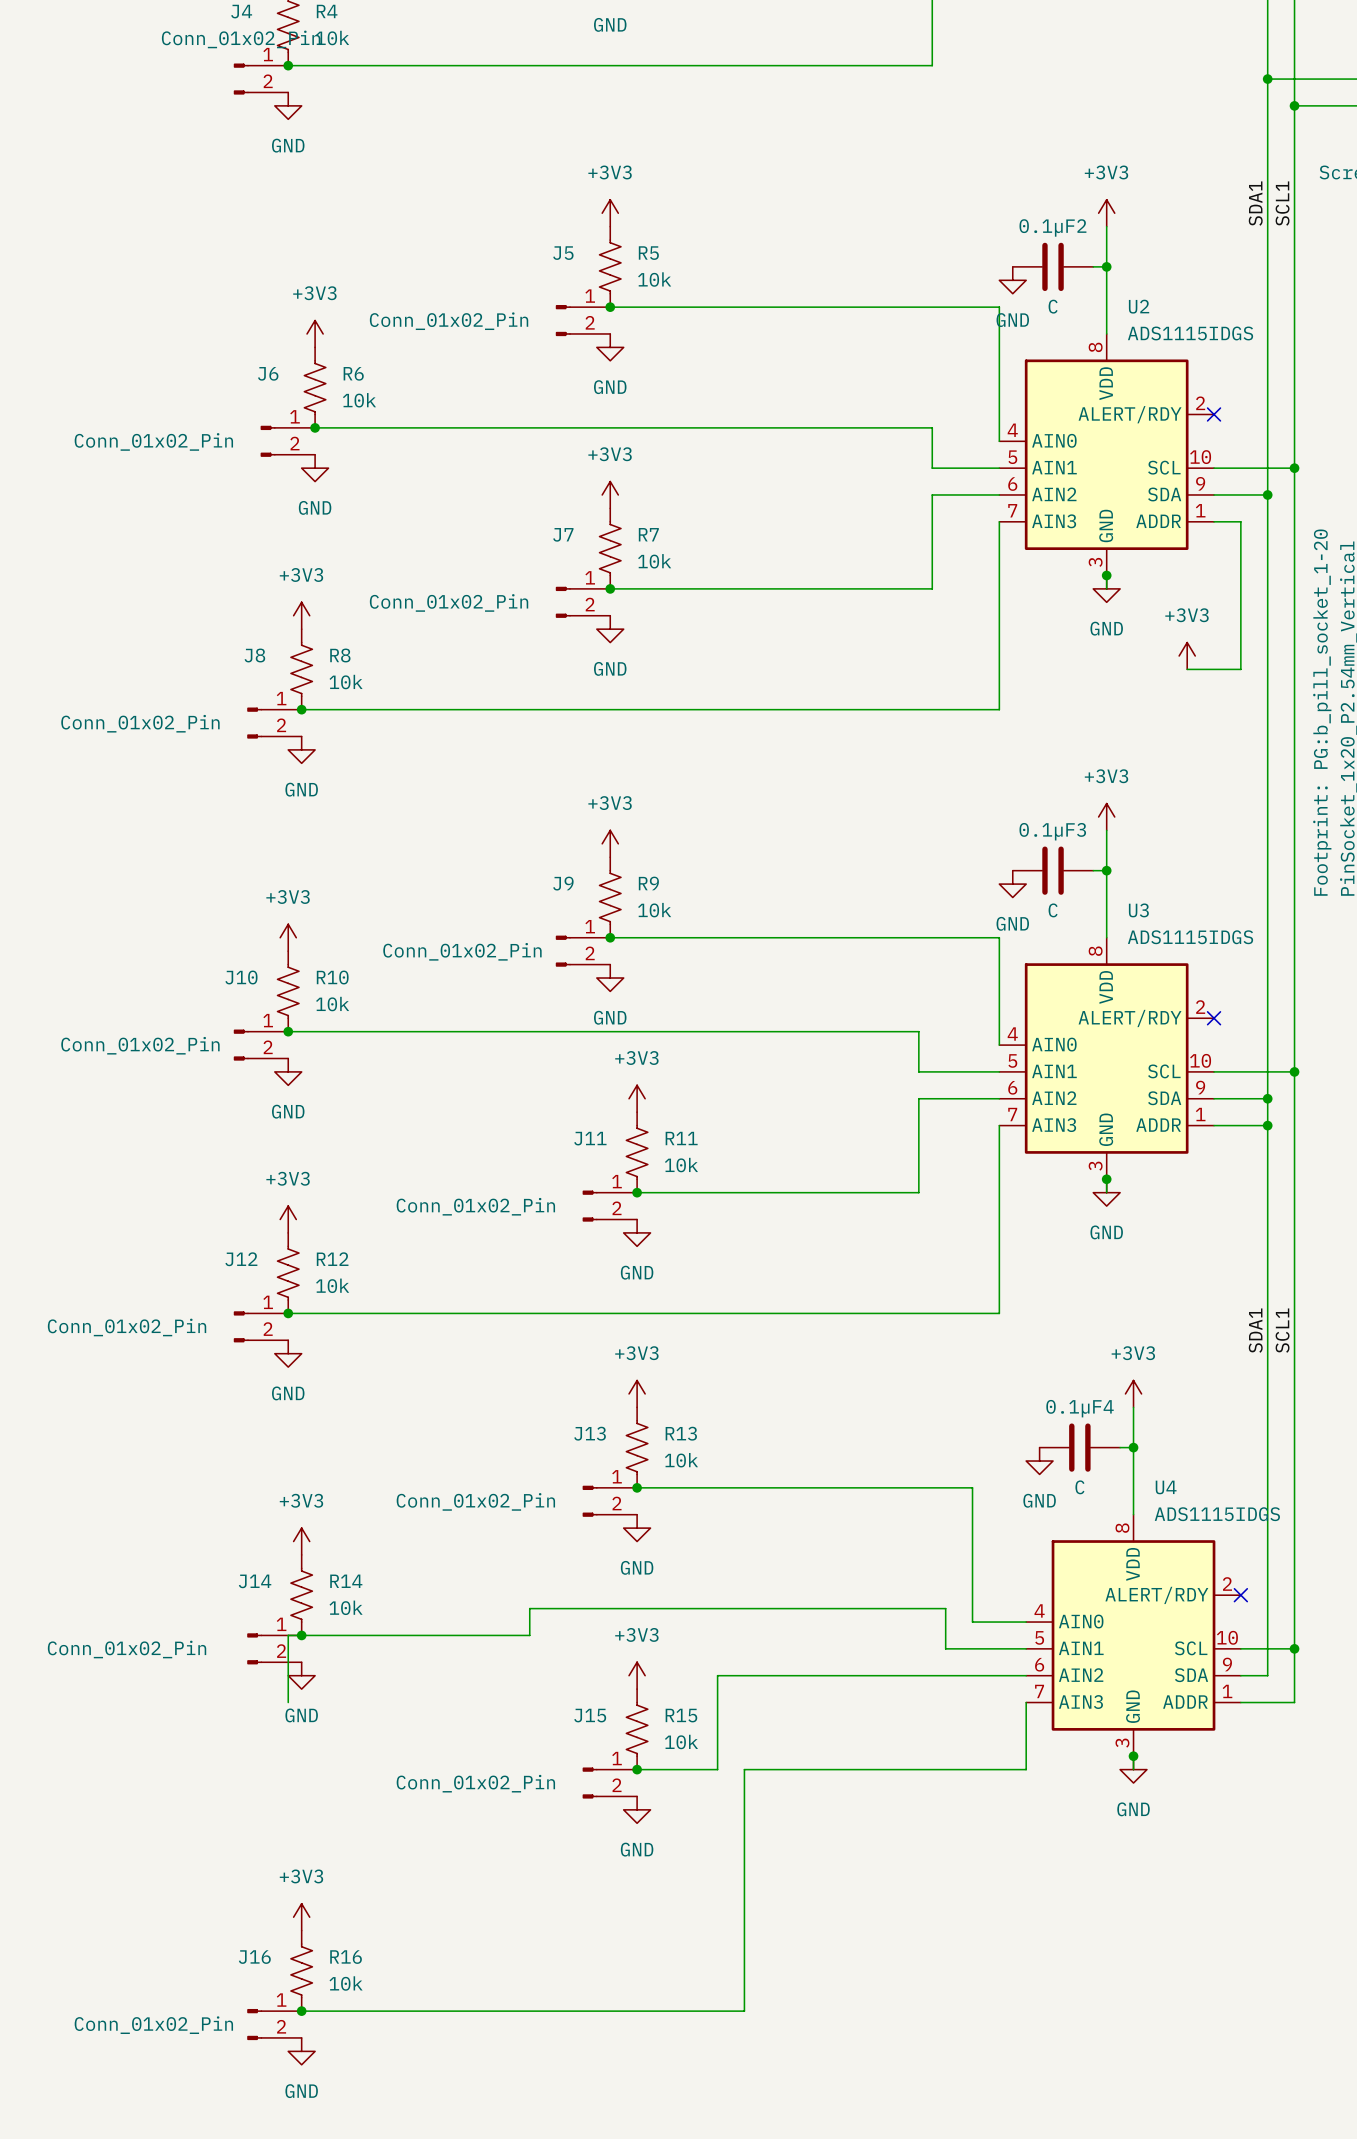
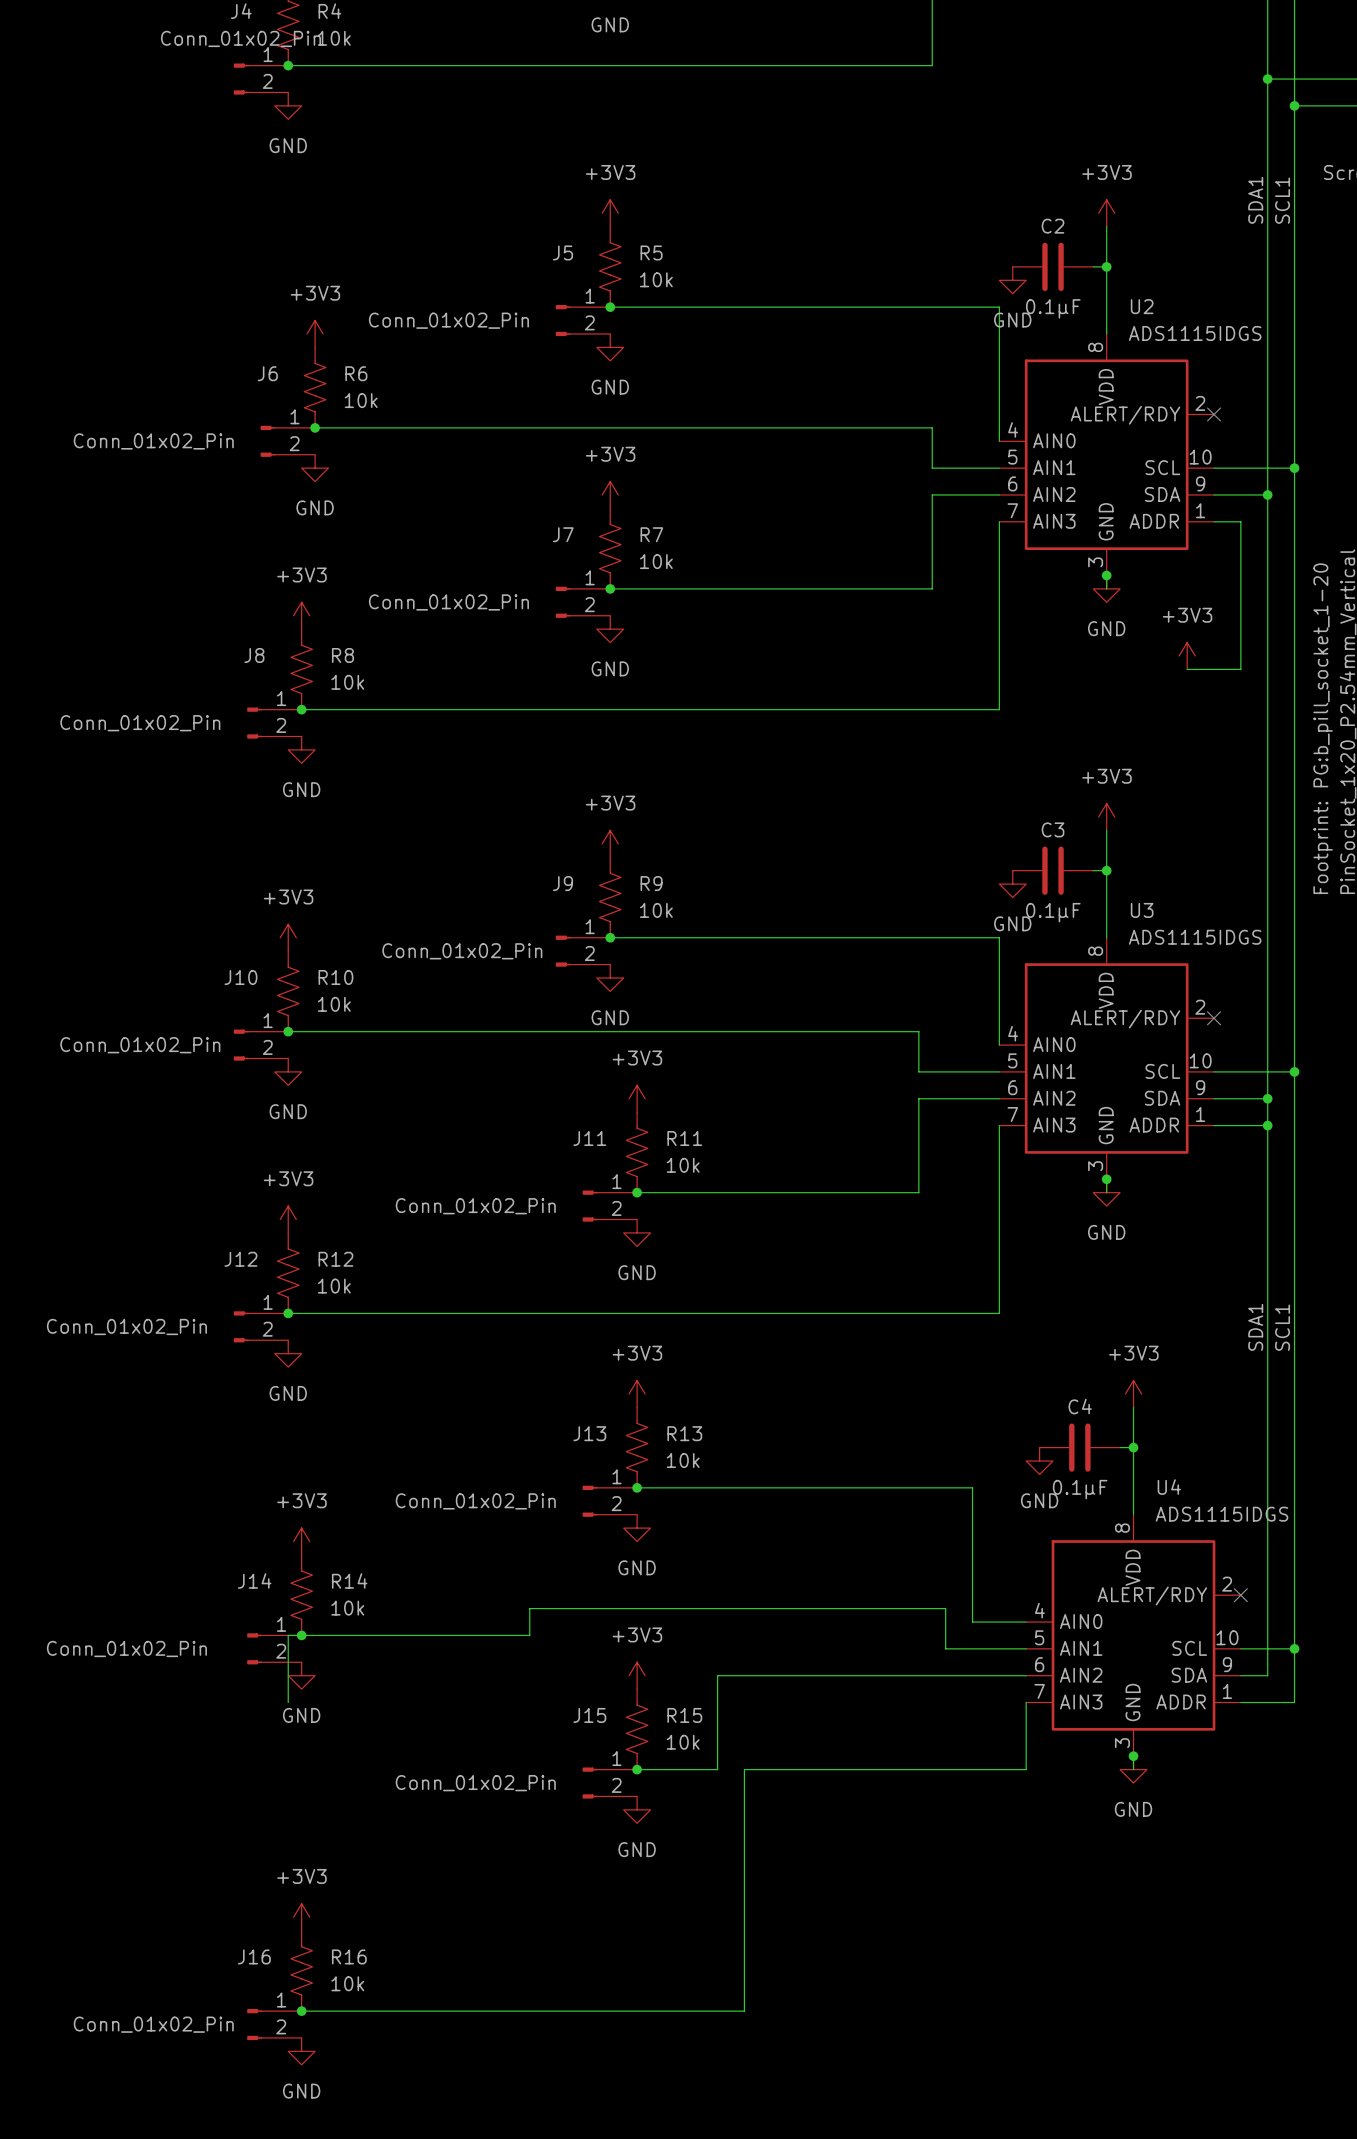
0.1µF2 name: 0.1µF2 (1052, 227) -> C2 (1053, 226)
0.1µF2 value: C (1053, 306) -> 0.1µF (1053, 308)
0.1µF3 name: 0.1µF3 (1052, 831) -> C3 (1053, 829)
0.1µF3 value: C (1053, 910) -> 0.1µF (1053, 912)
0.1µF4 name: 0.1µF4 (1080, 1408) -> C4 (1080, 1406)
0.1µF4 value: C (1079, 1487) -> 0.1µF (1080, 1489)

